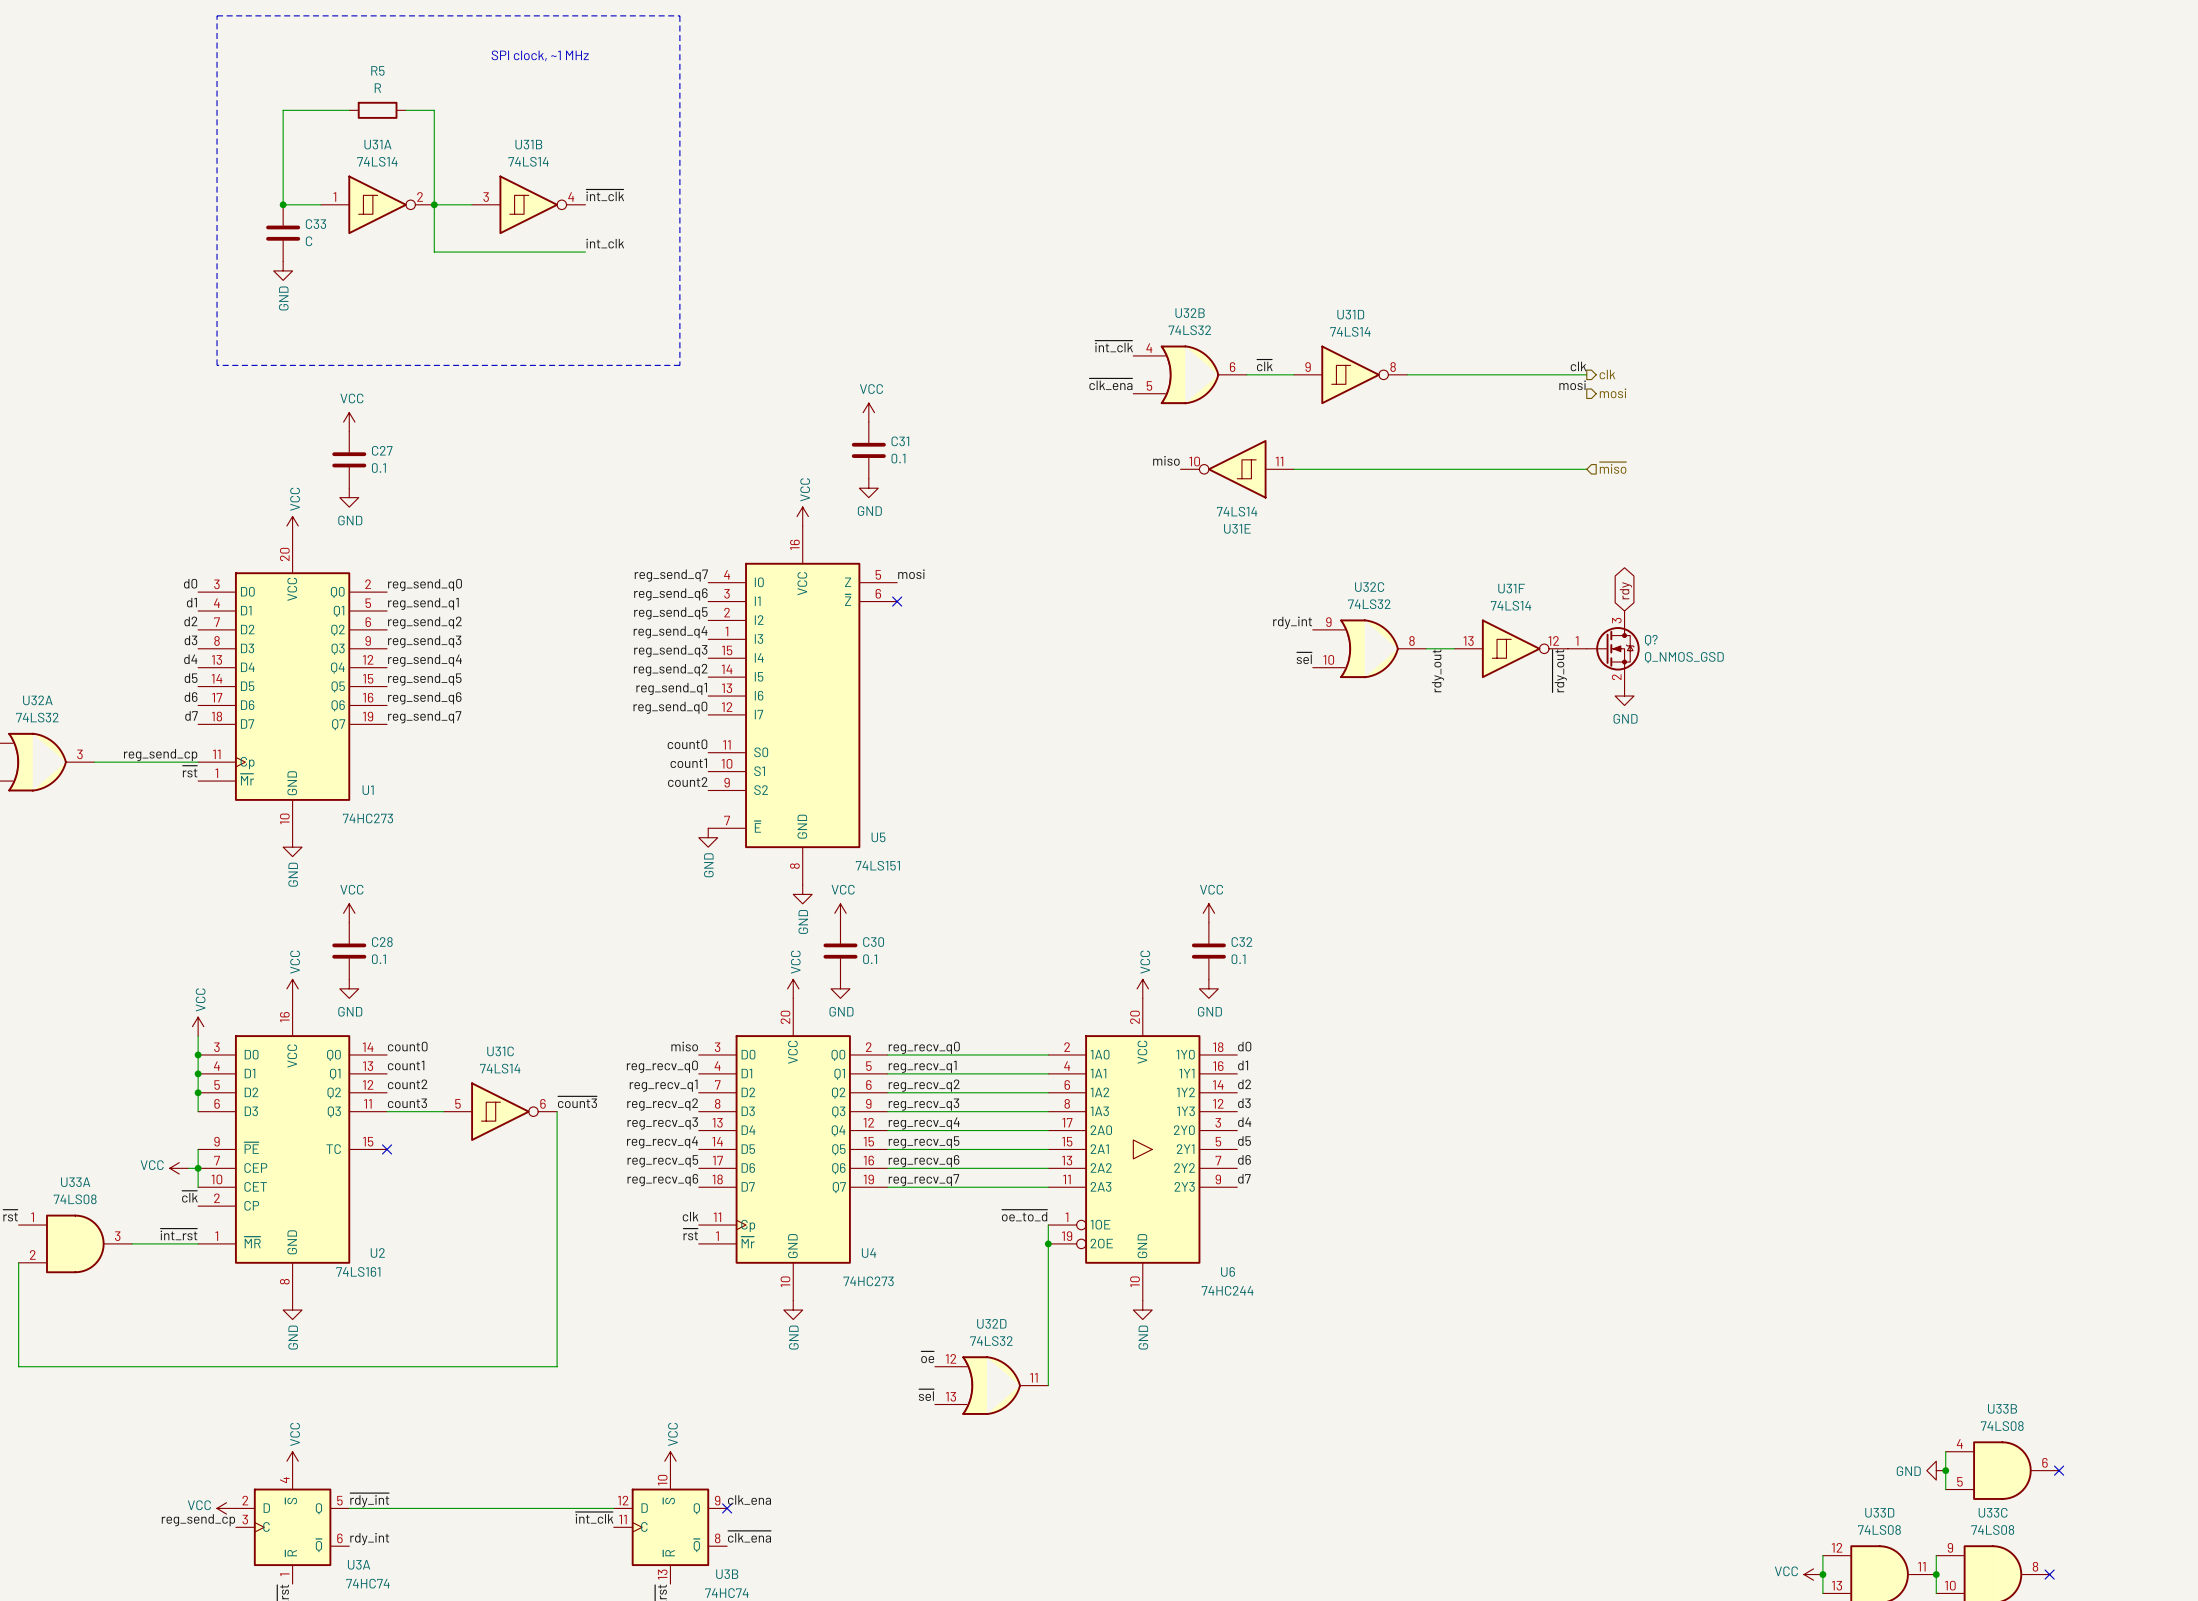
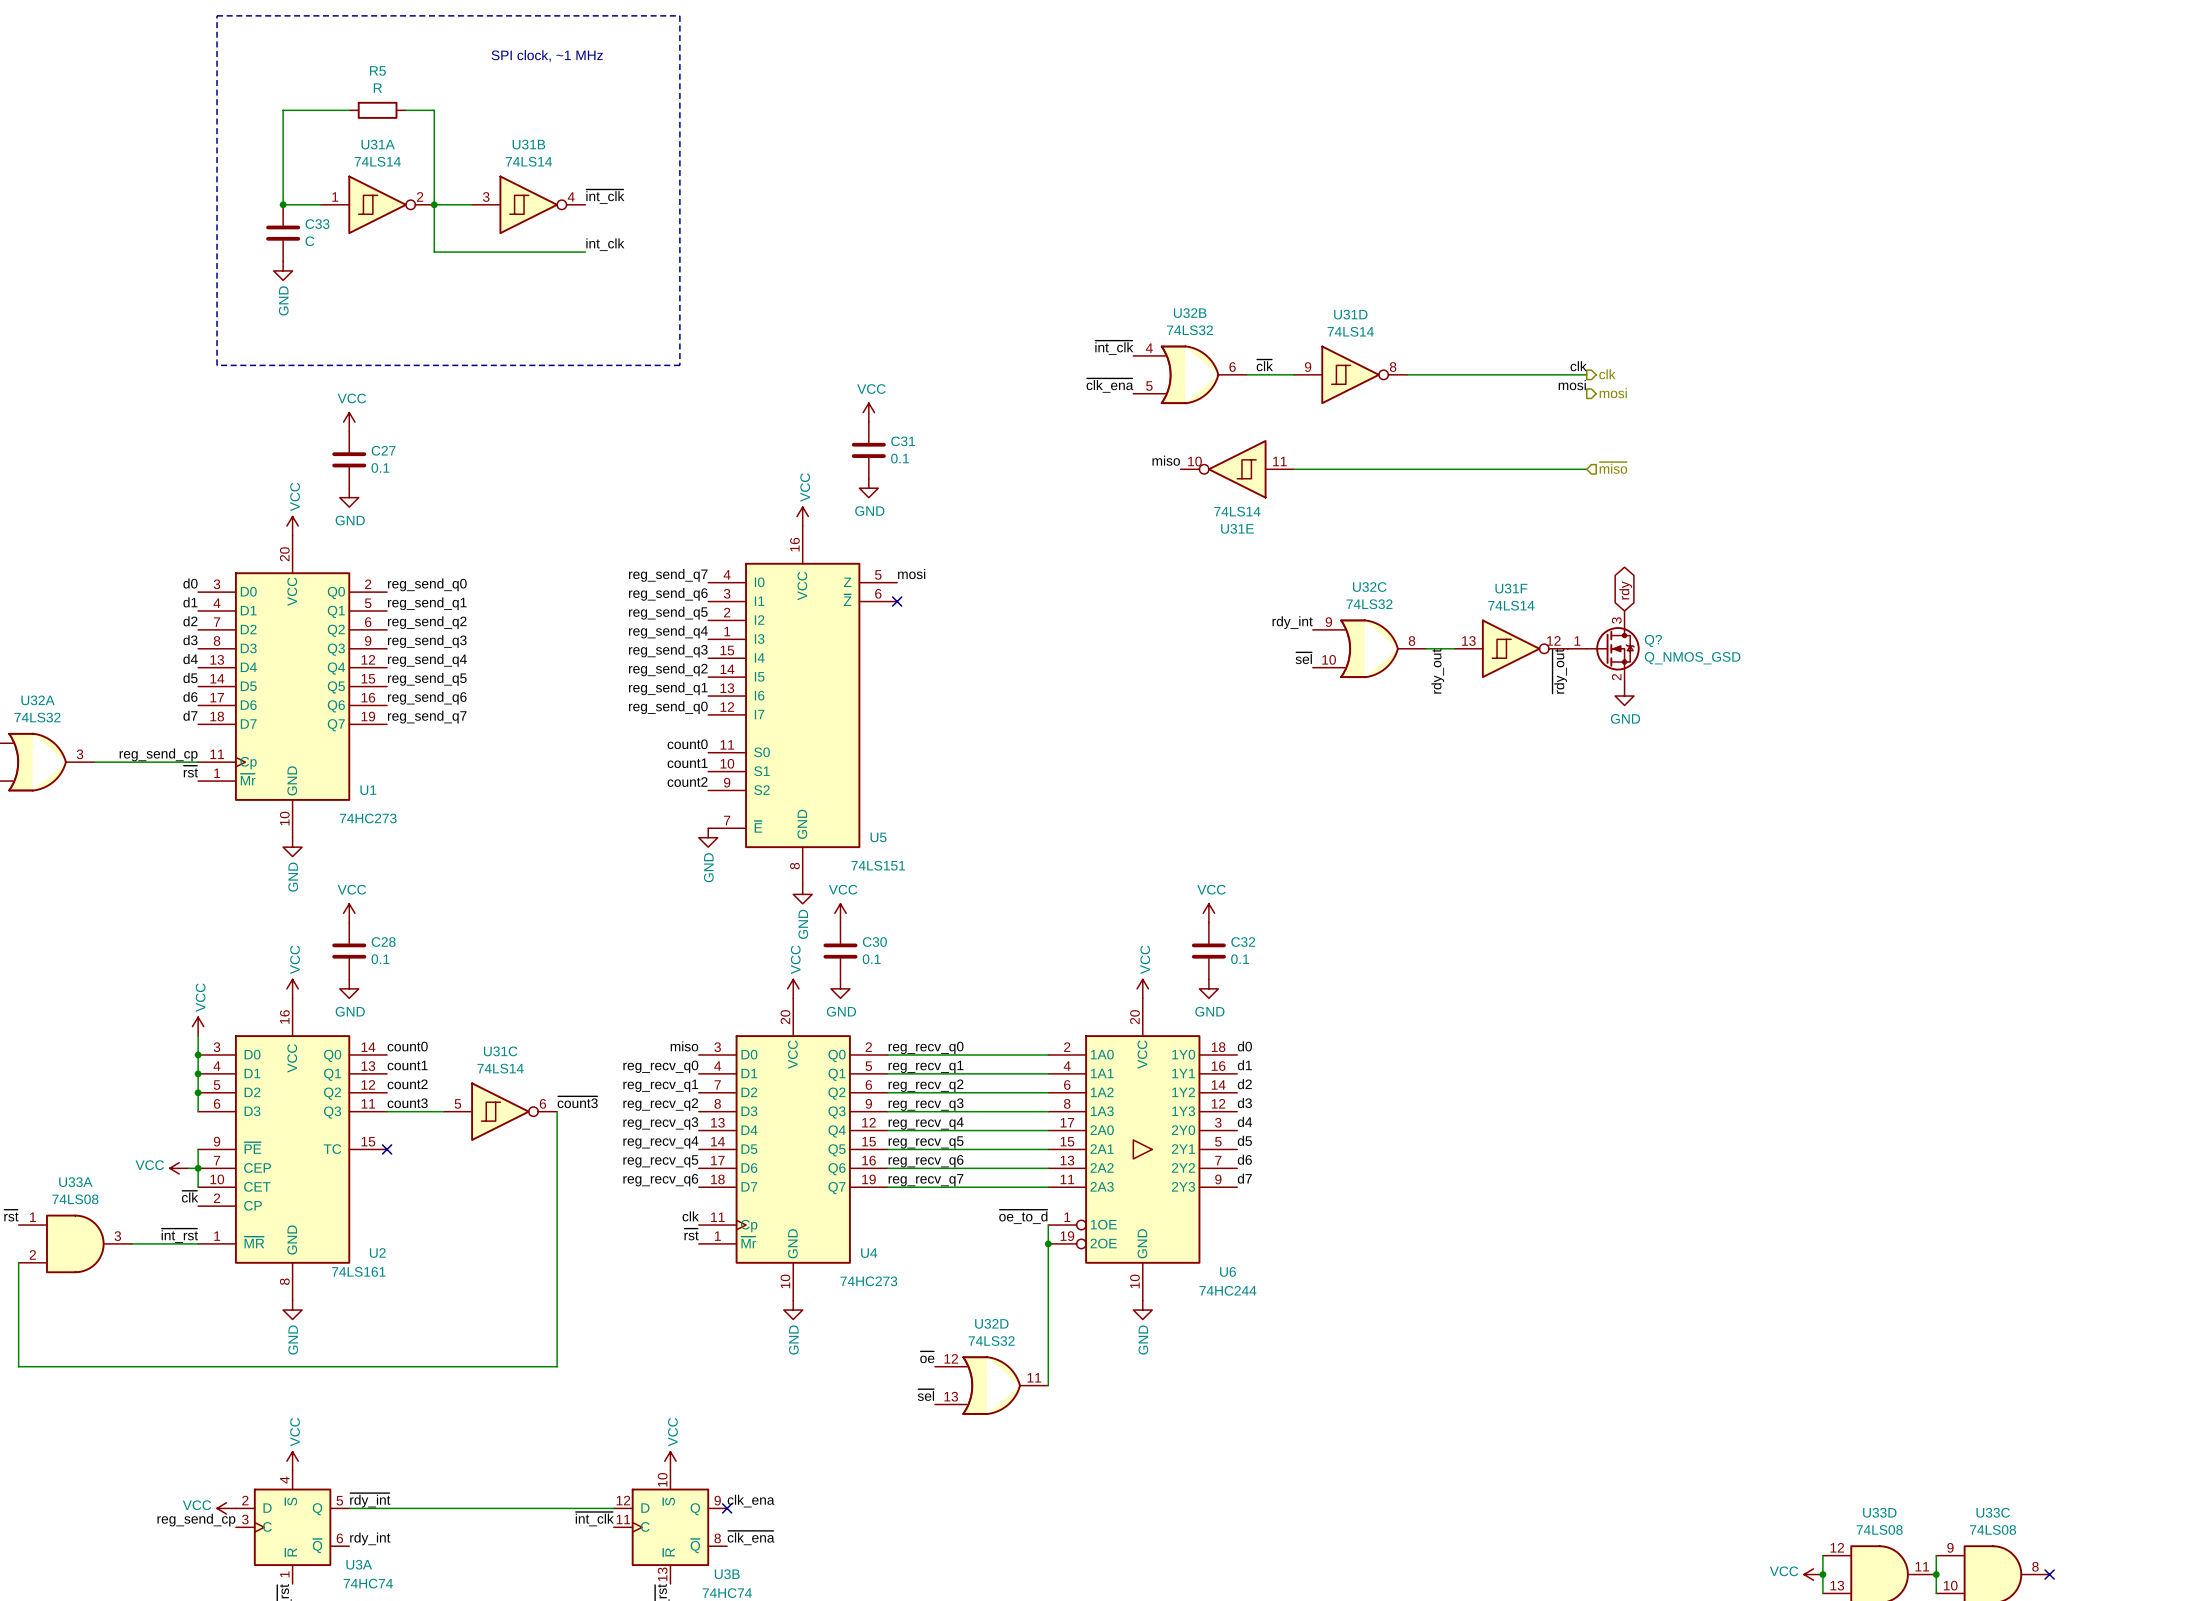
wire: (1945, 1451) (1945, 1489) -> none
power symbol: GND (1936, 1470) -> none
junction: (1945, 1470) -> none
U33B: 74LS08 (2002, 1470) -> none
no-connect mark: (2059, 1470) -> none

